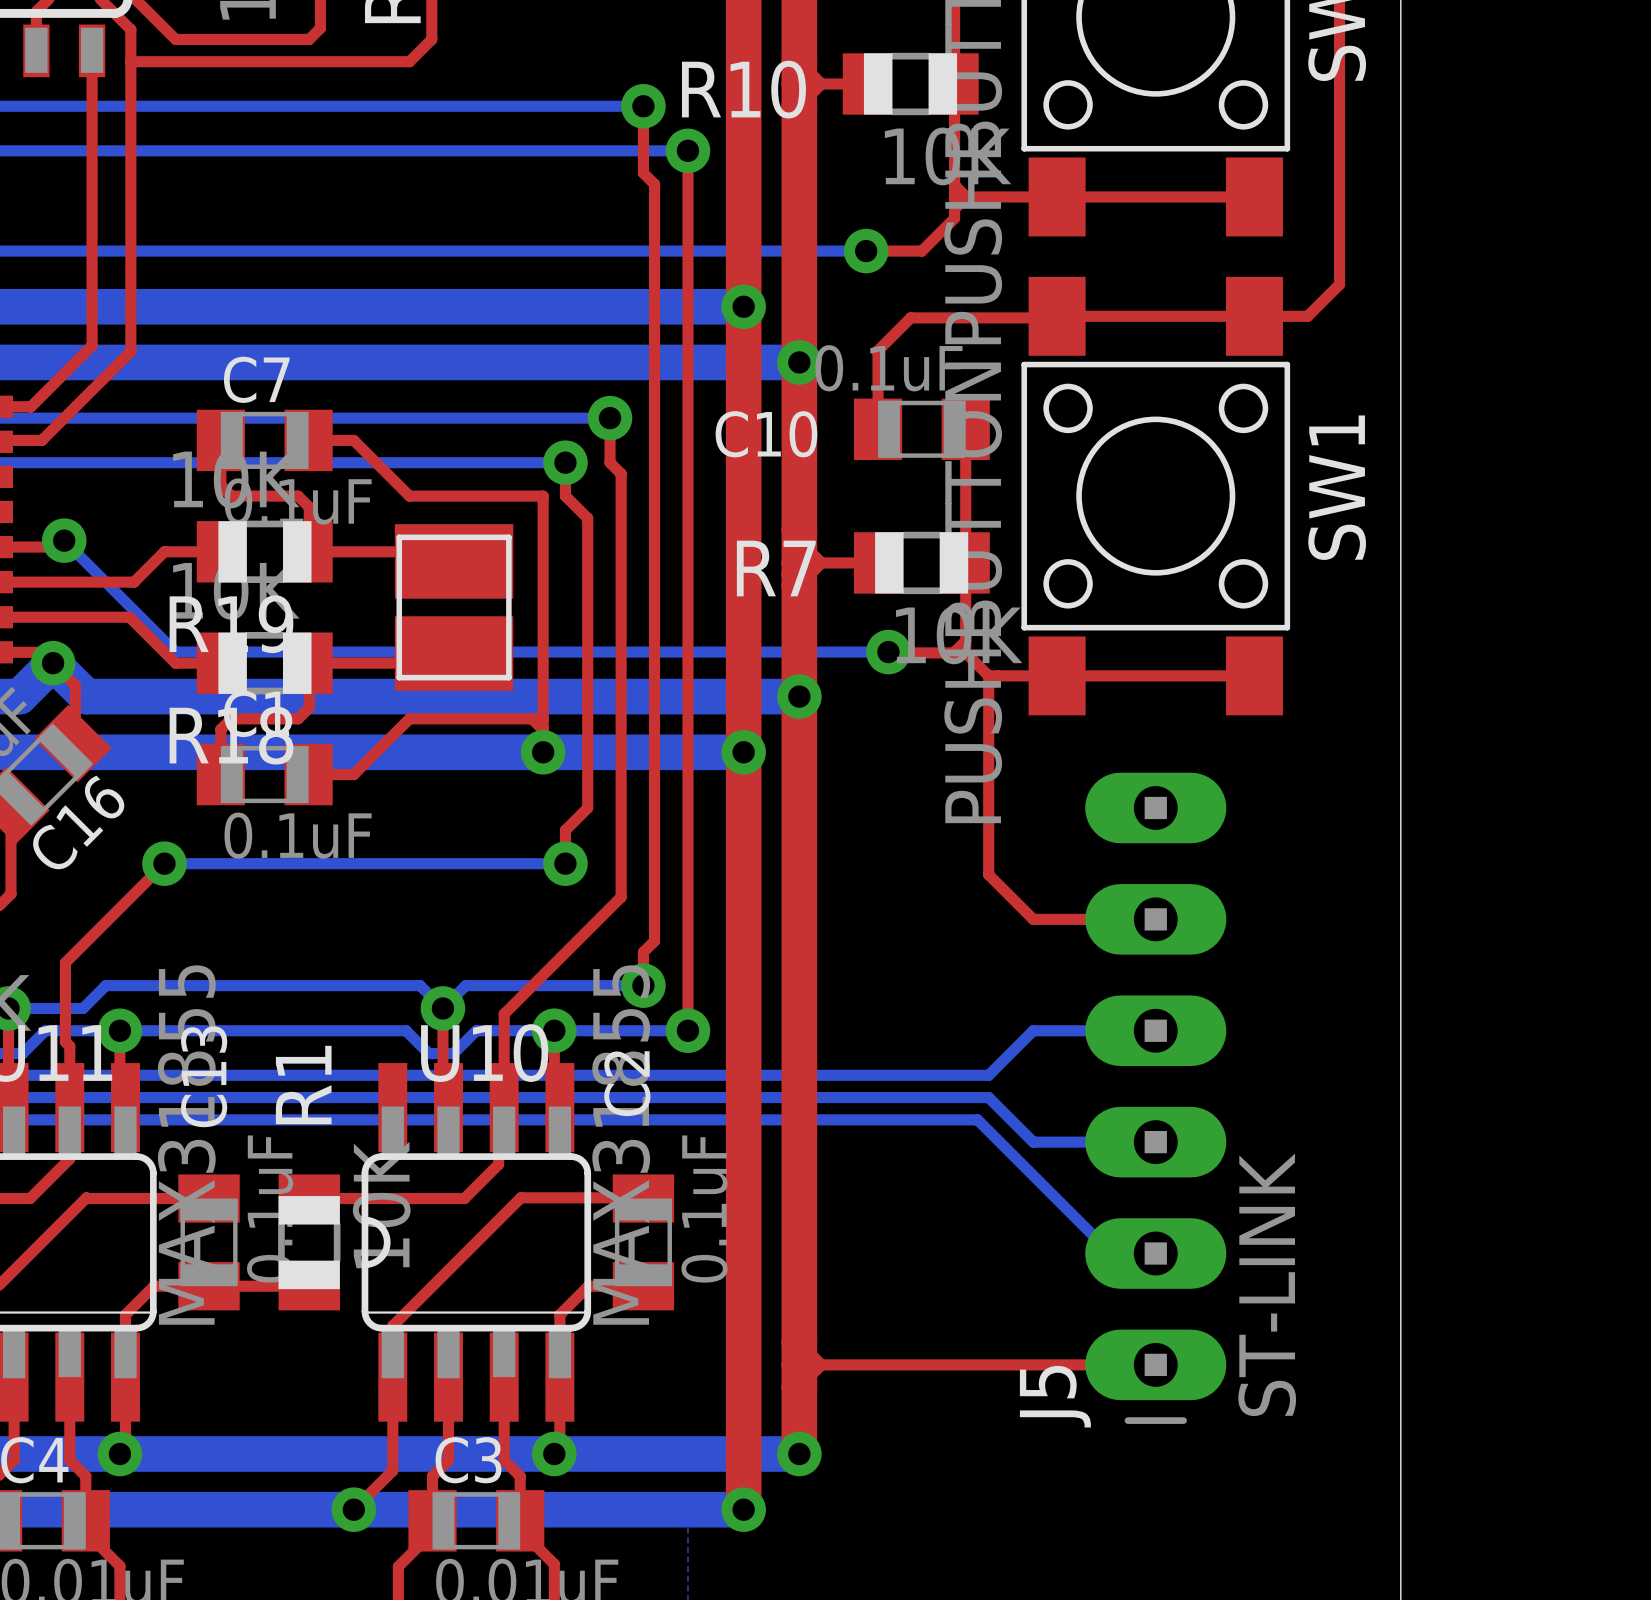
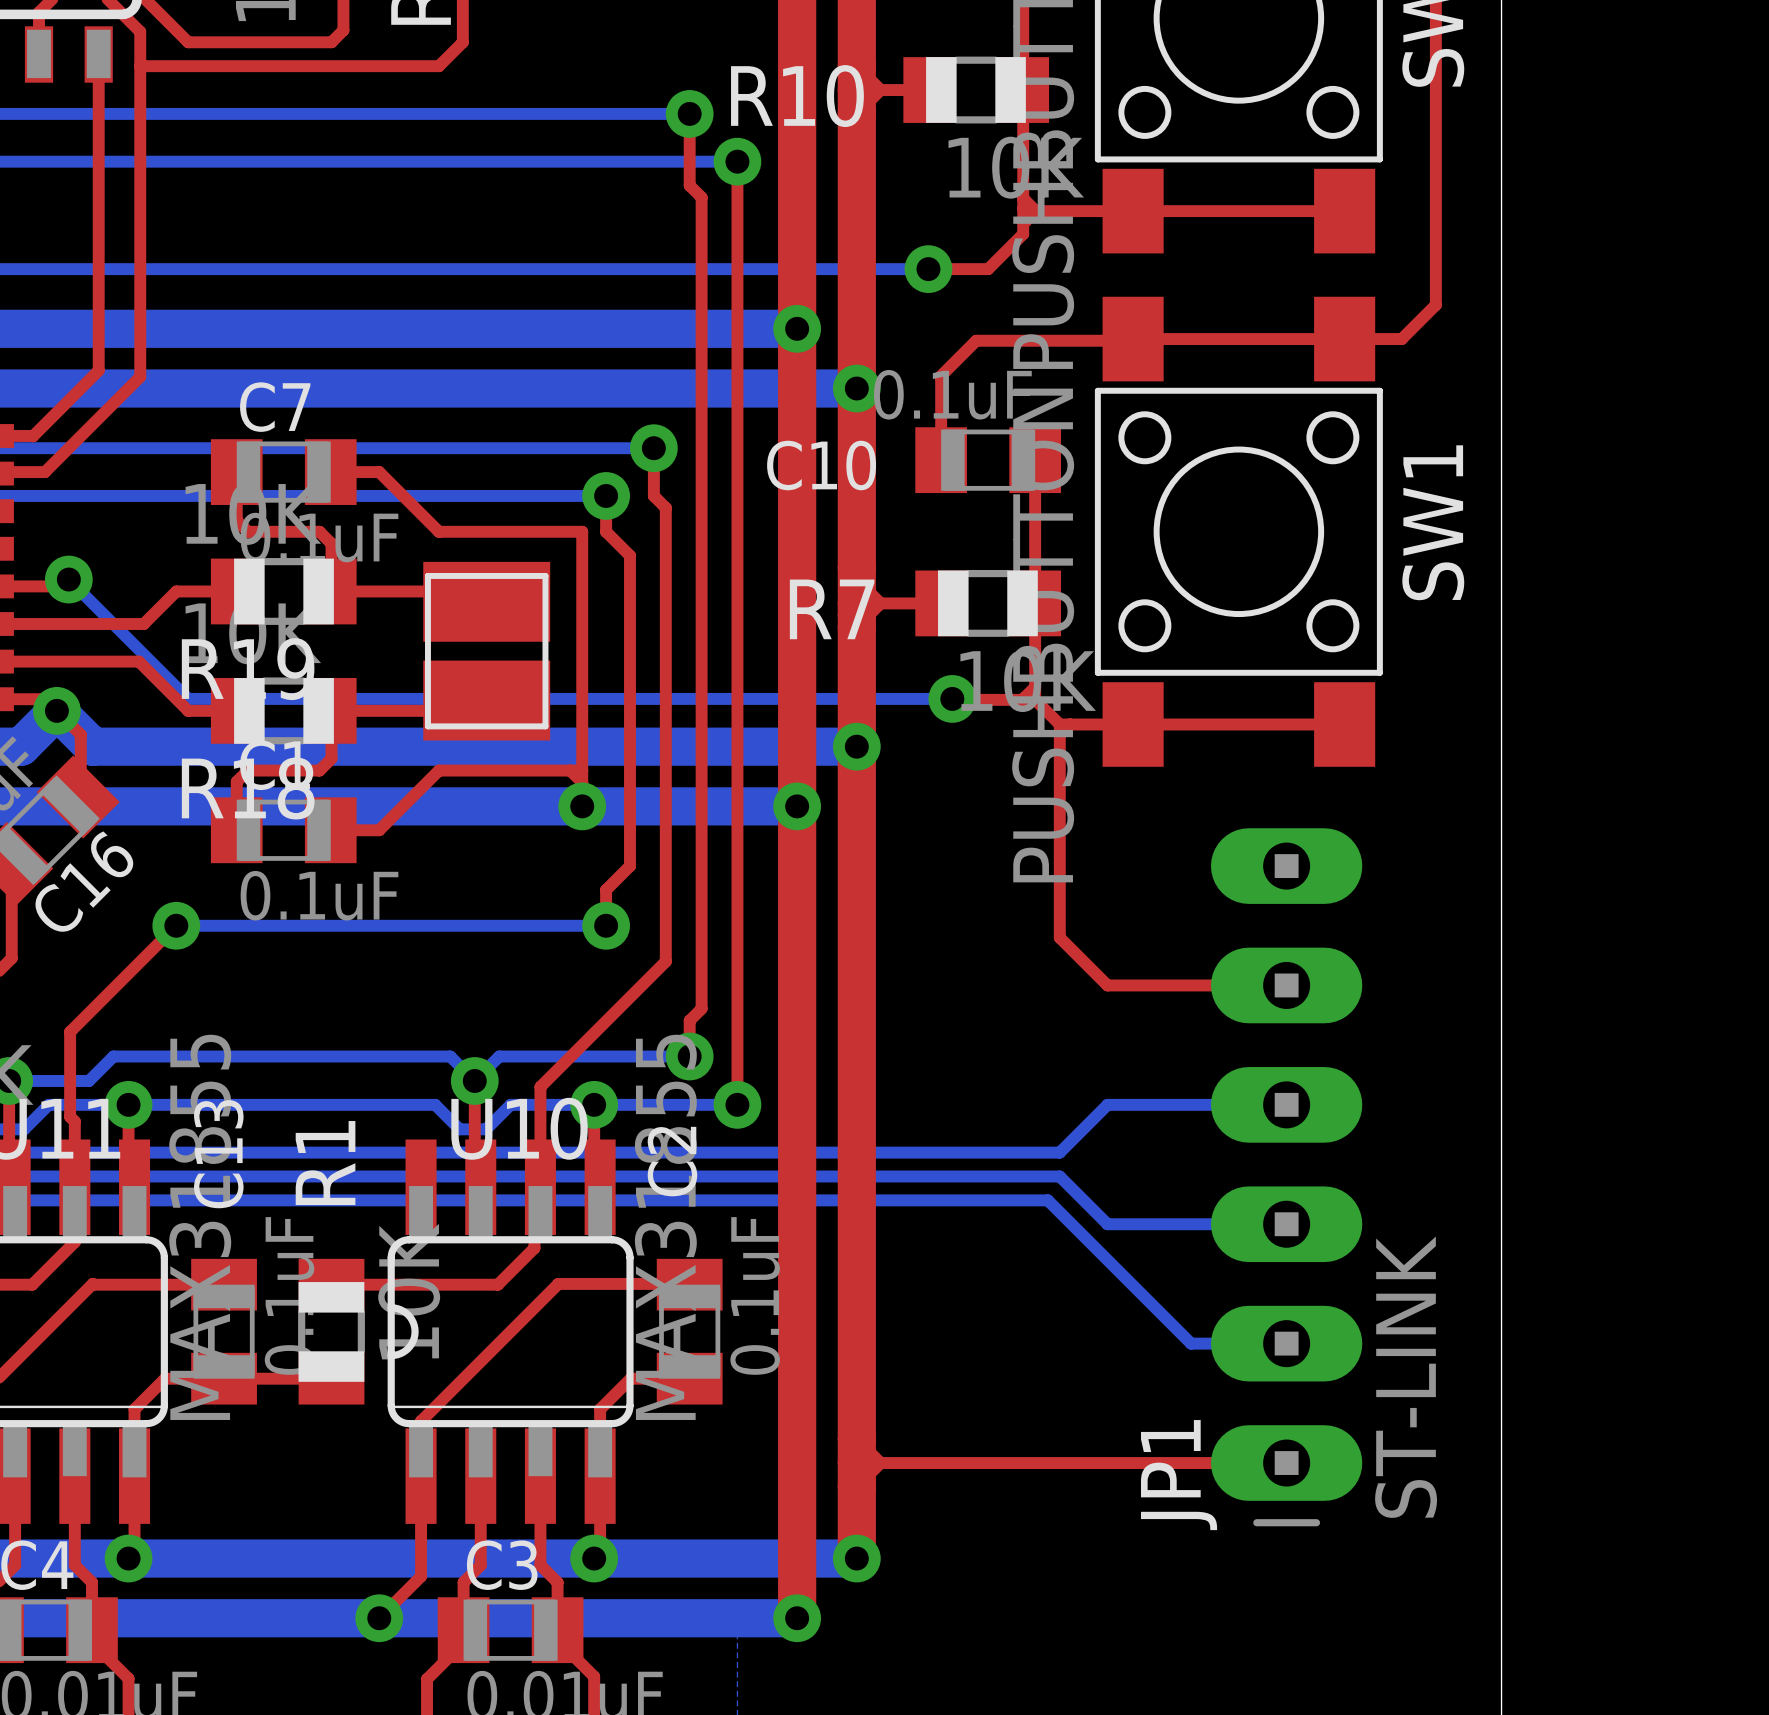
J5: ST-LINK (1155, 1098) -> none
JP1: none -> ST-LINK (1286, 1177)

